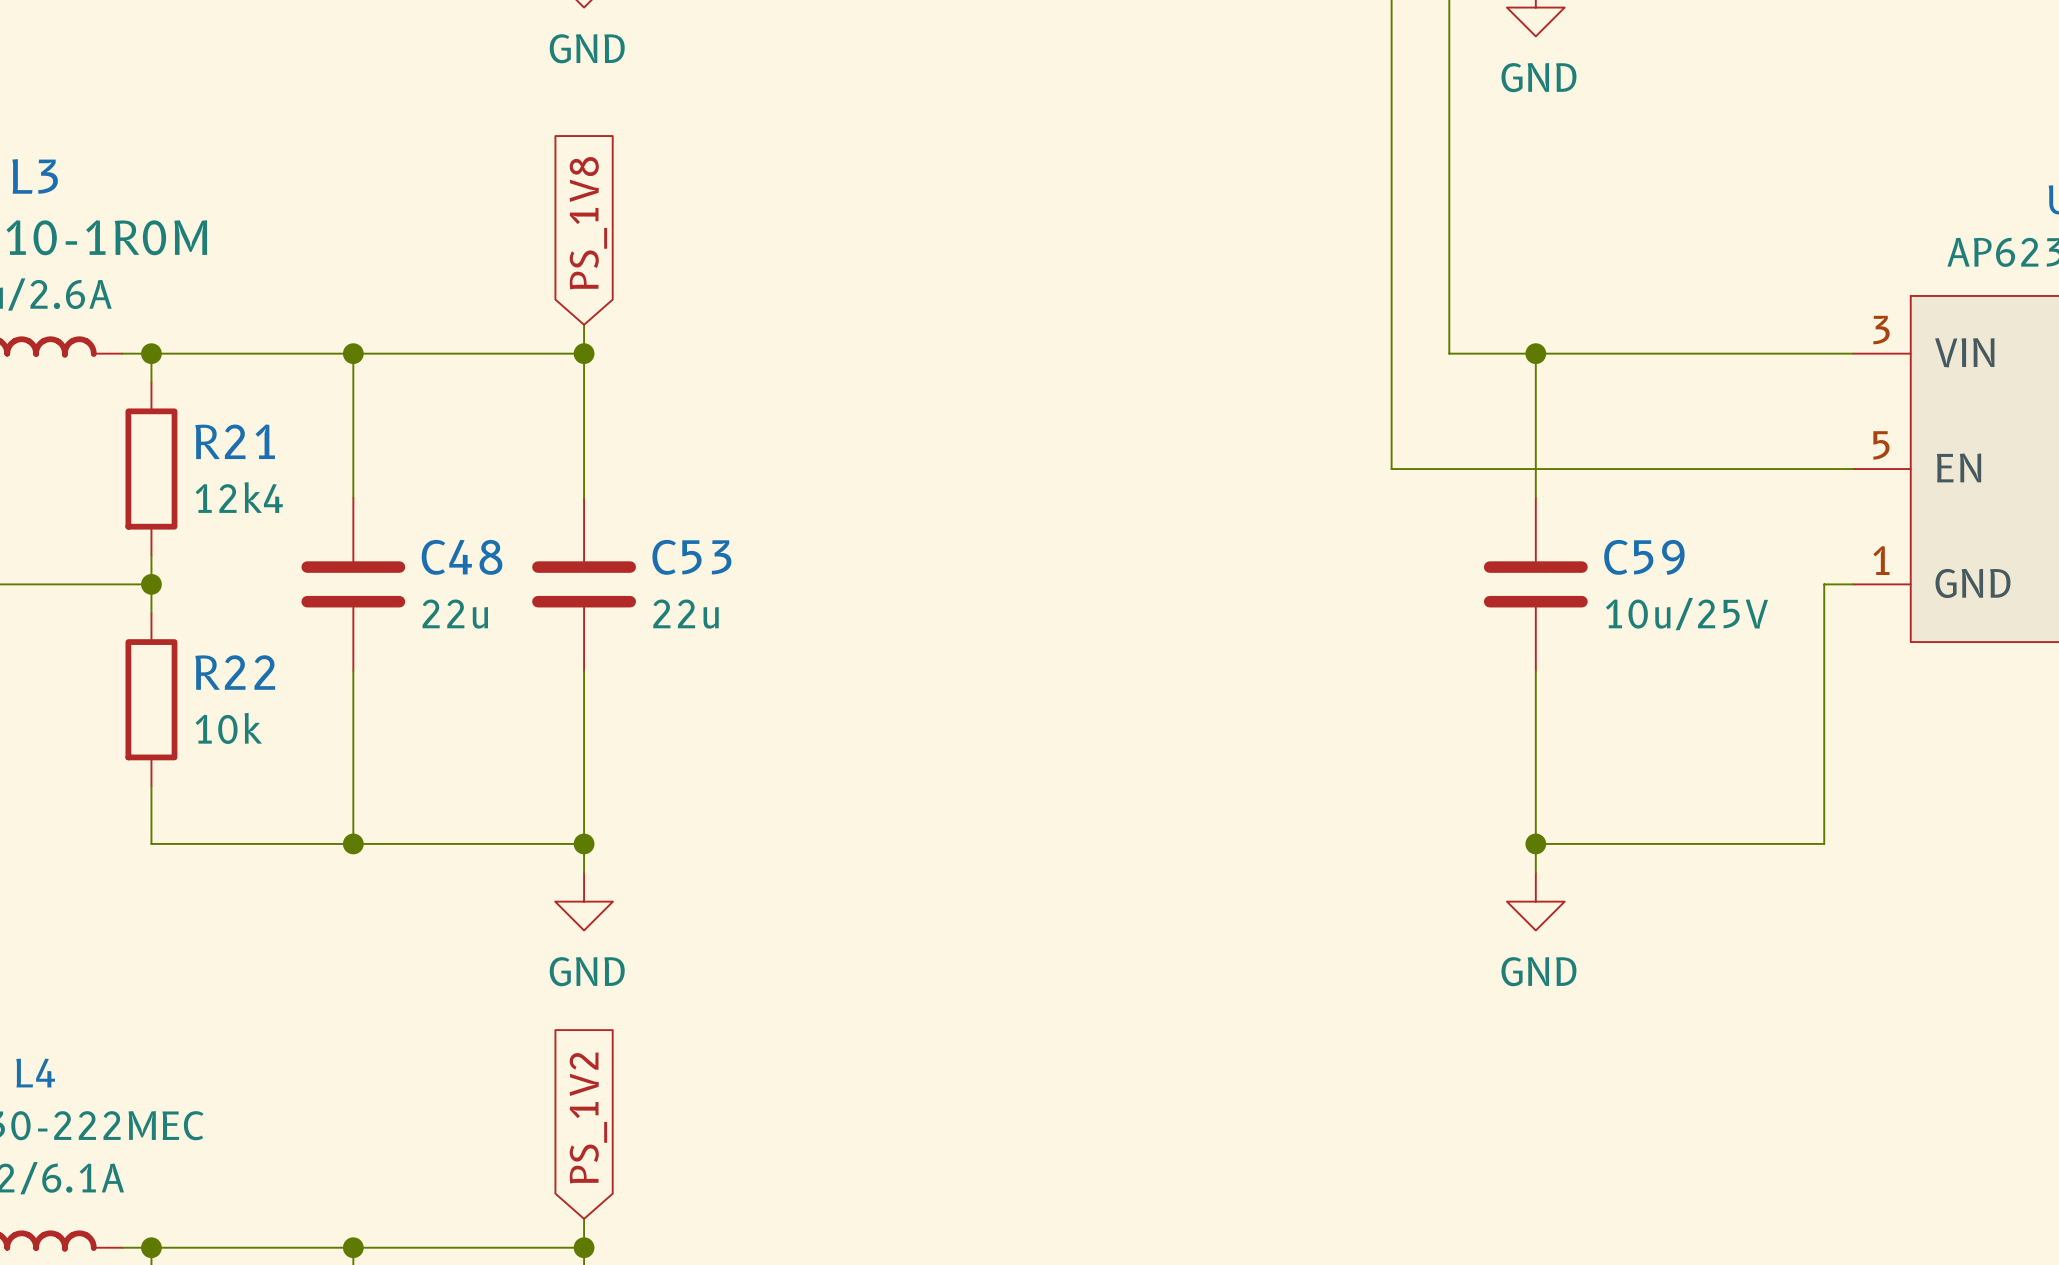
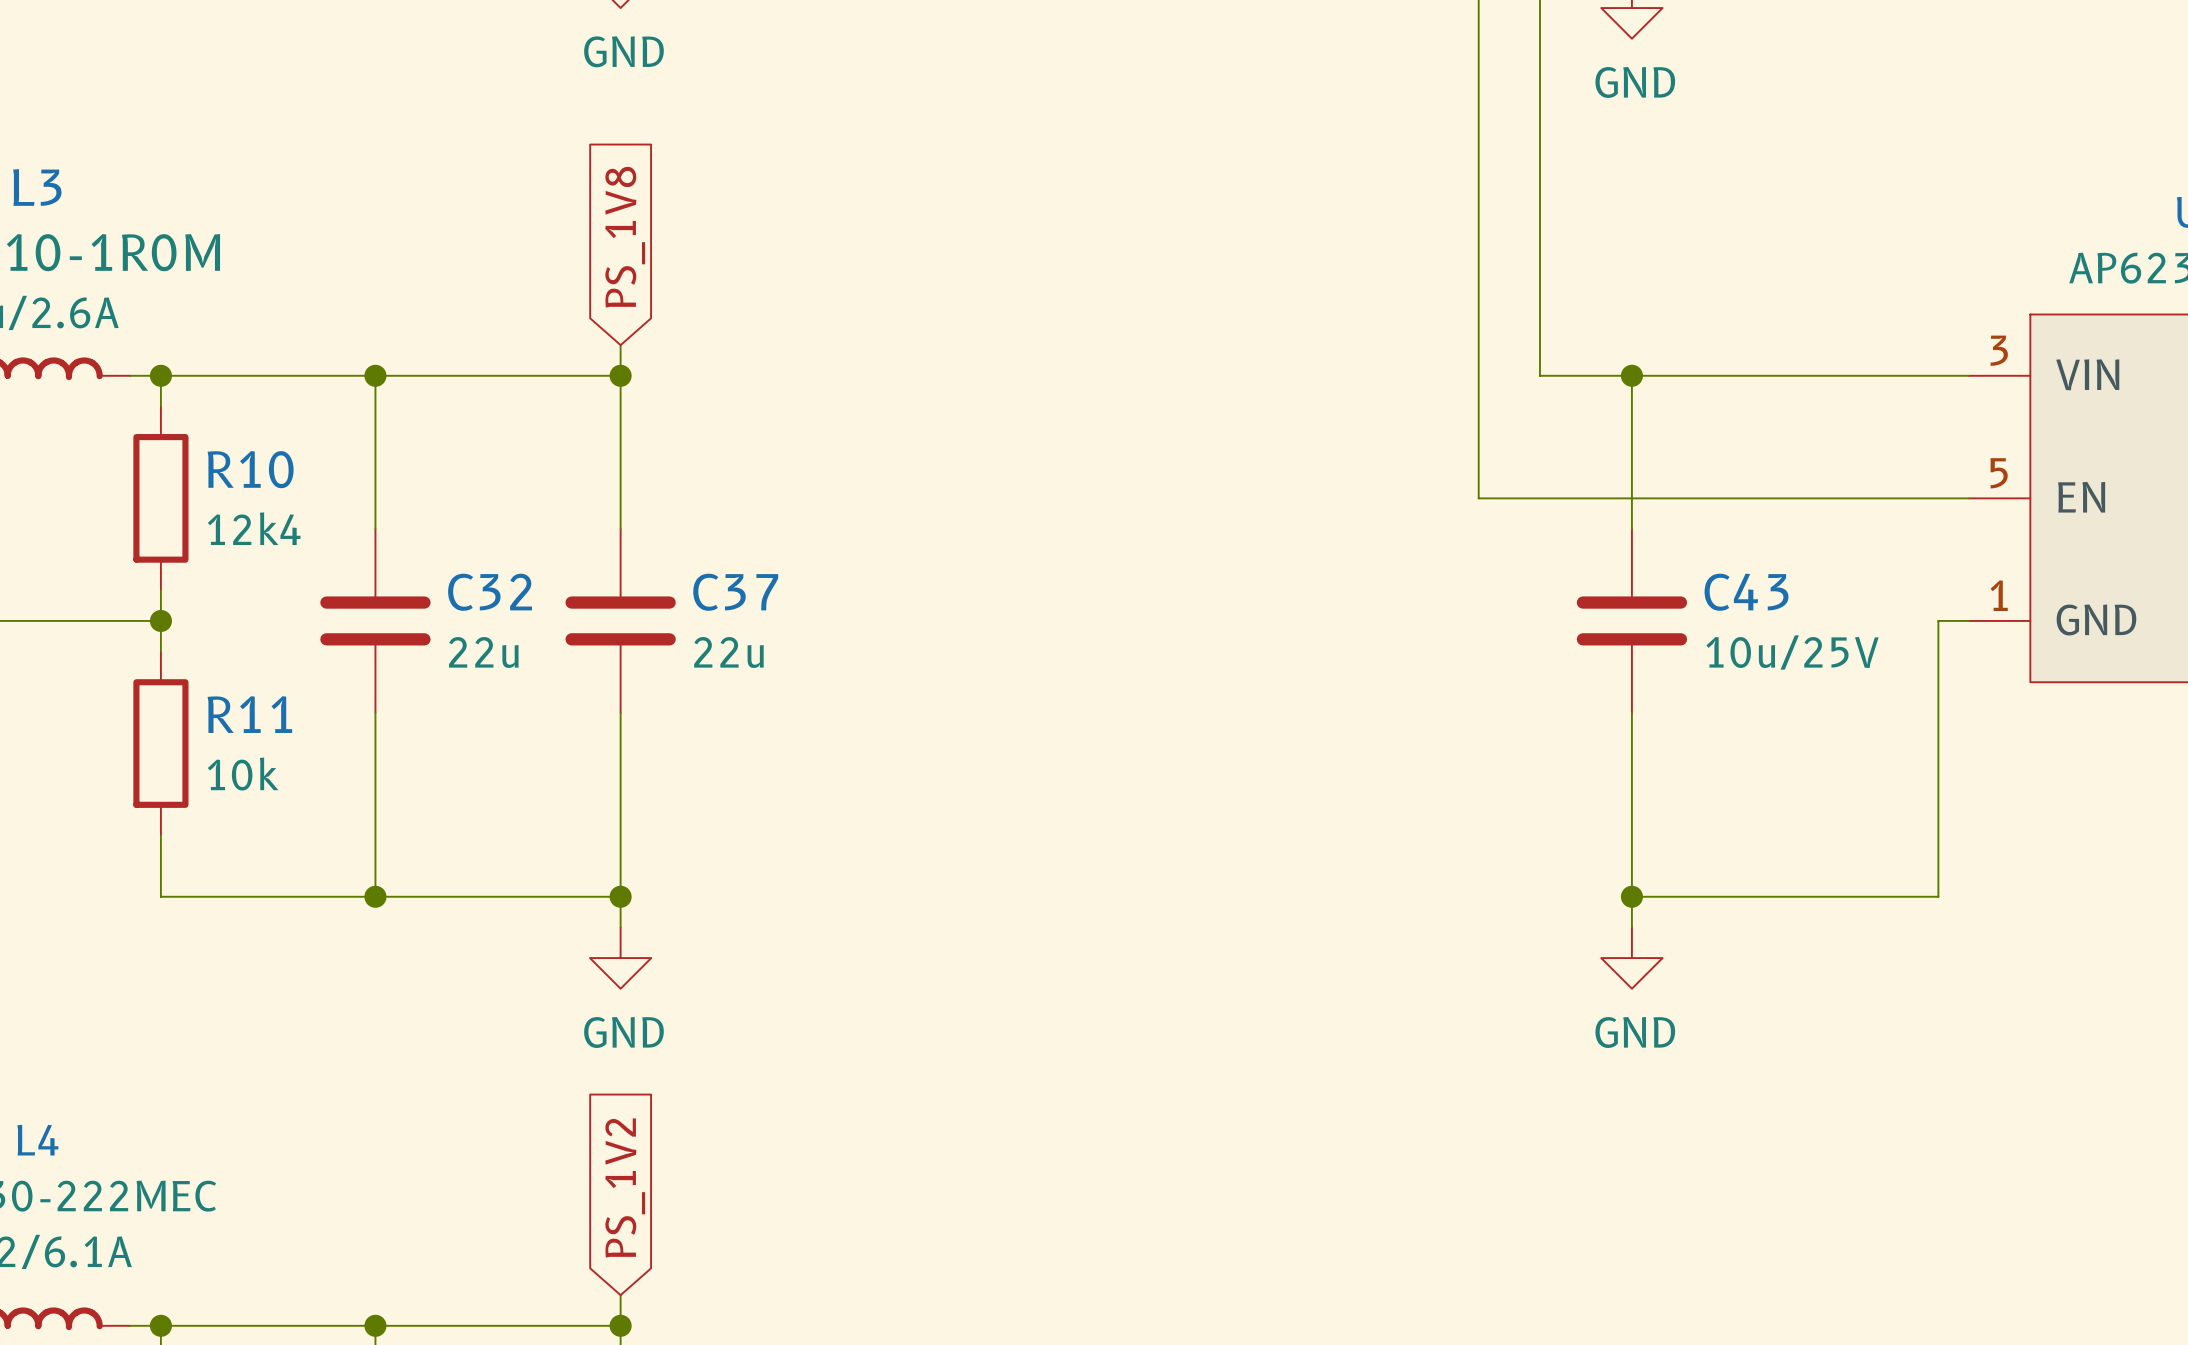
R21 name: R21 (235, 441) -> R10 (250, 469)
C48 name: C48 (462, 557) -> C32 (490, 592)
C53 name: C53 (691, 557) -> C37 (735, 592)
C59 name: C59 (1644, 557) -> C43 (1746, 592)
R22 name: R22 (235, 672) -> R11 (249, 714)

